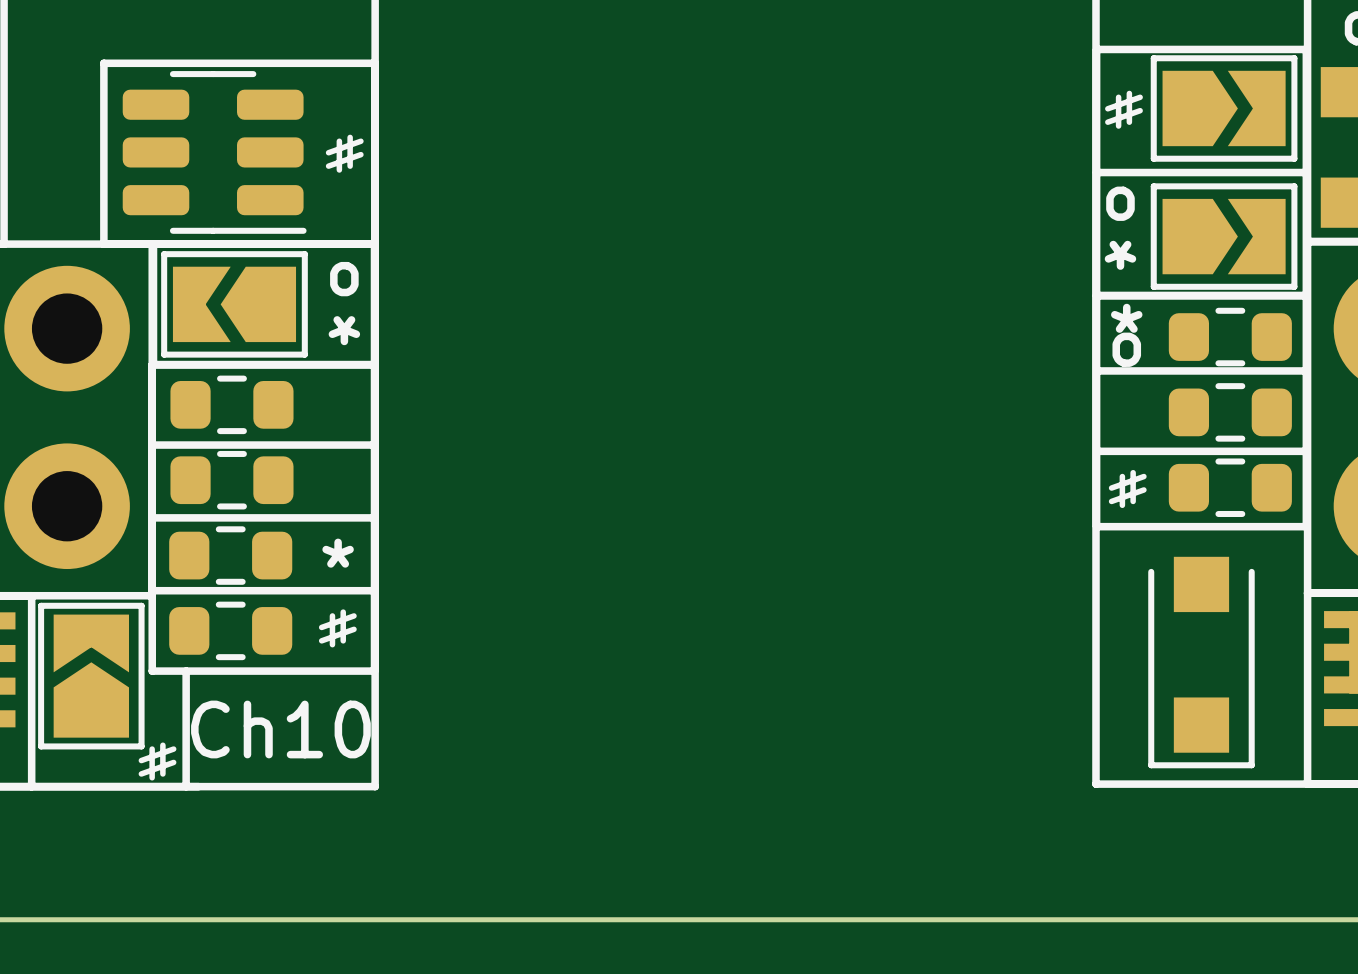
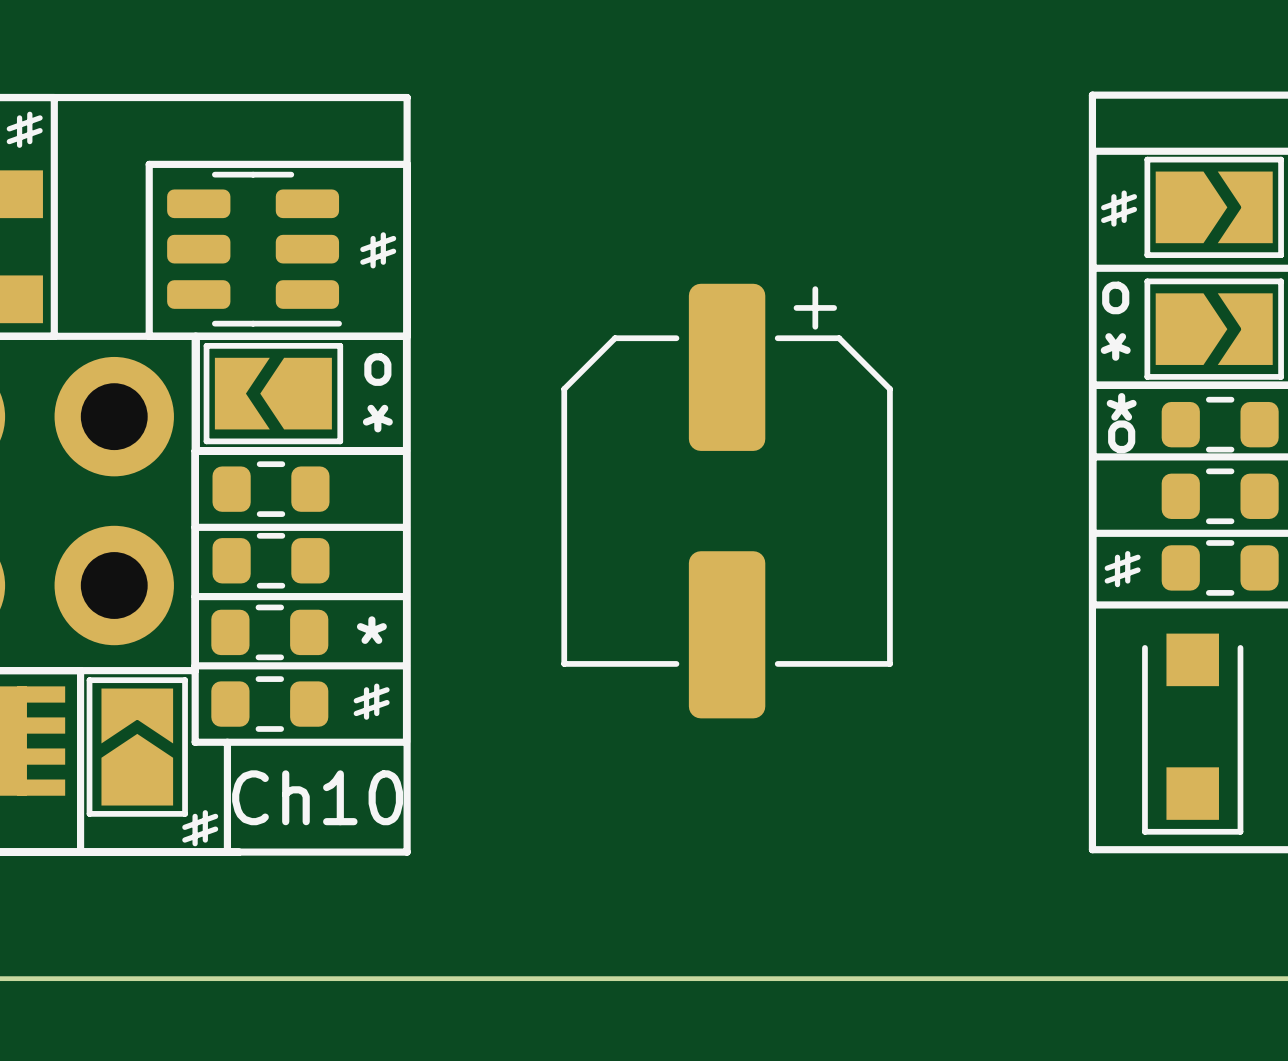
part: none -> (727, 501)

